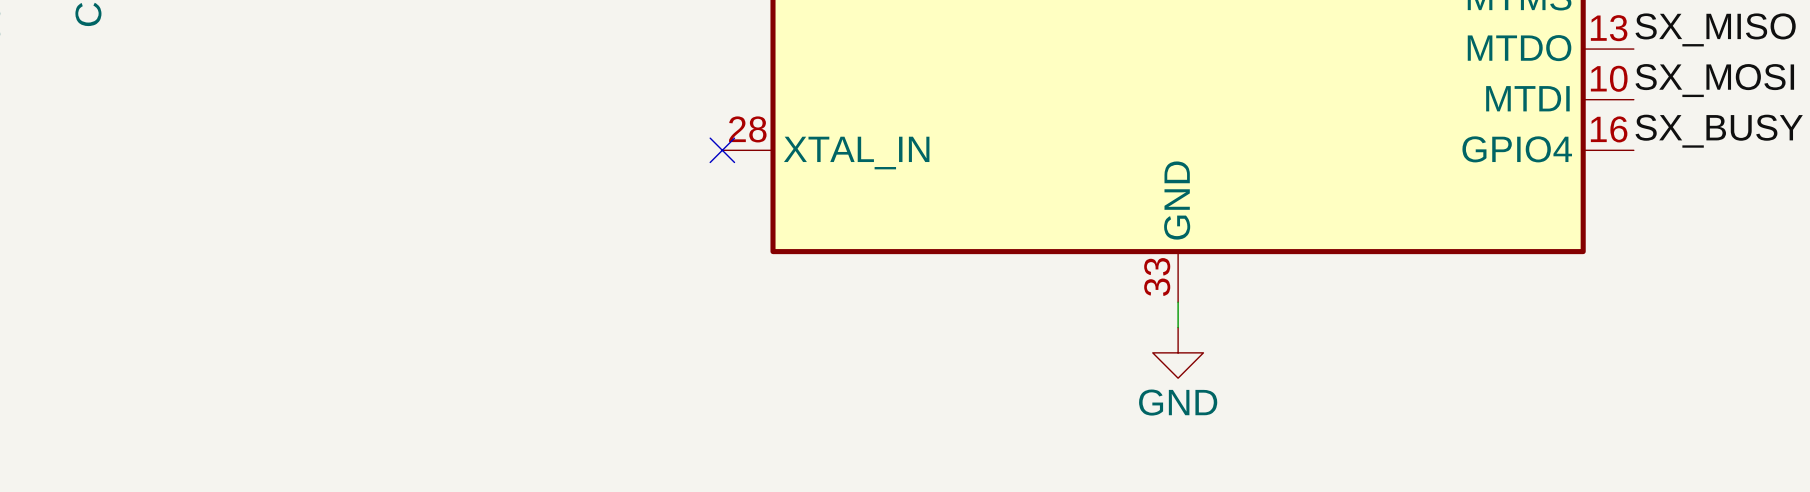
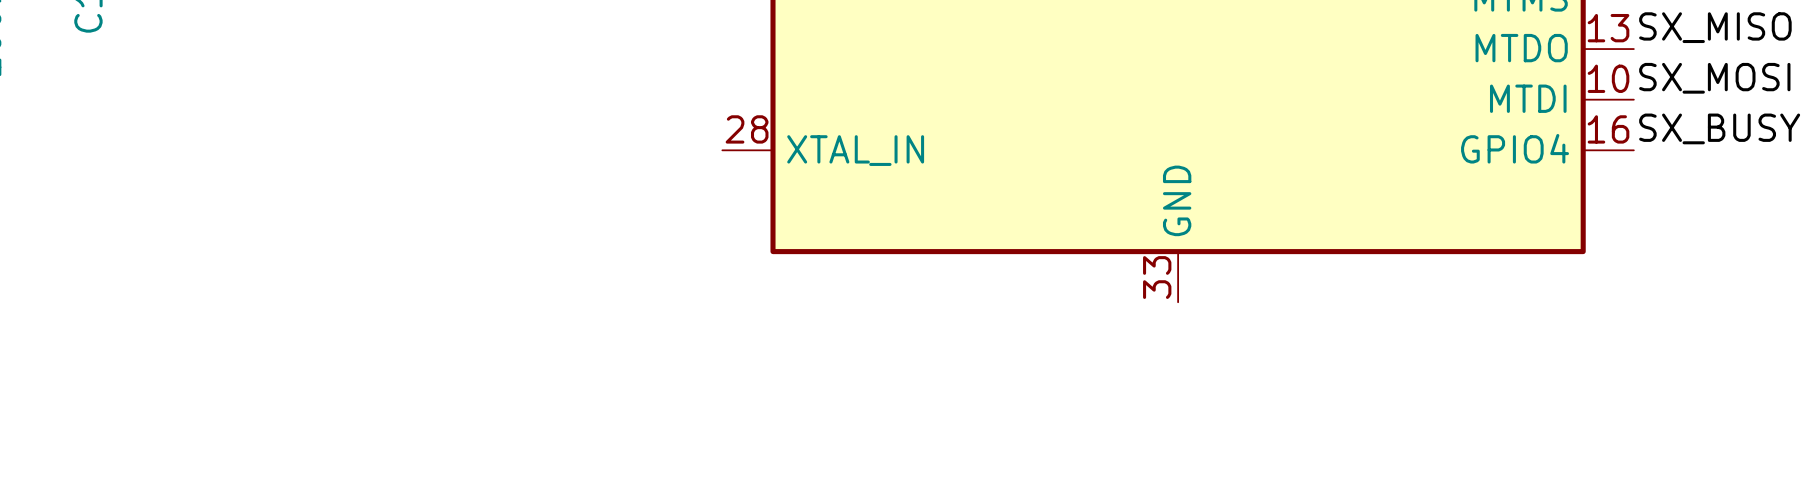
no-connect mark: (722, 150) -> none
wire: (1178, 302) (1178, 327) -> none
power symbol: GND (1178, 352) -> none

